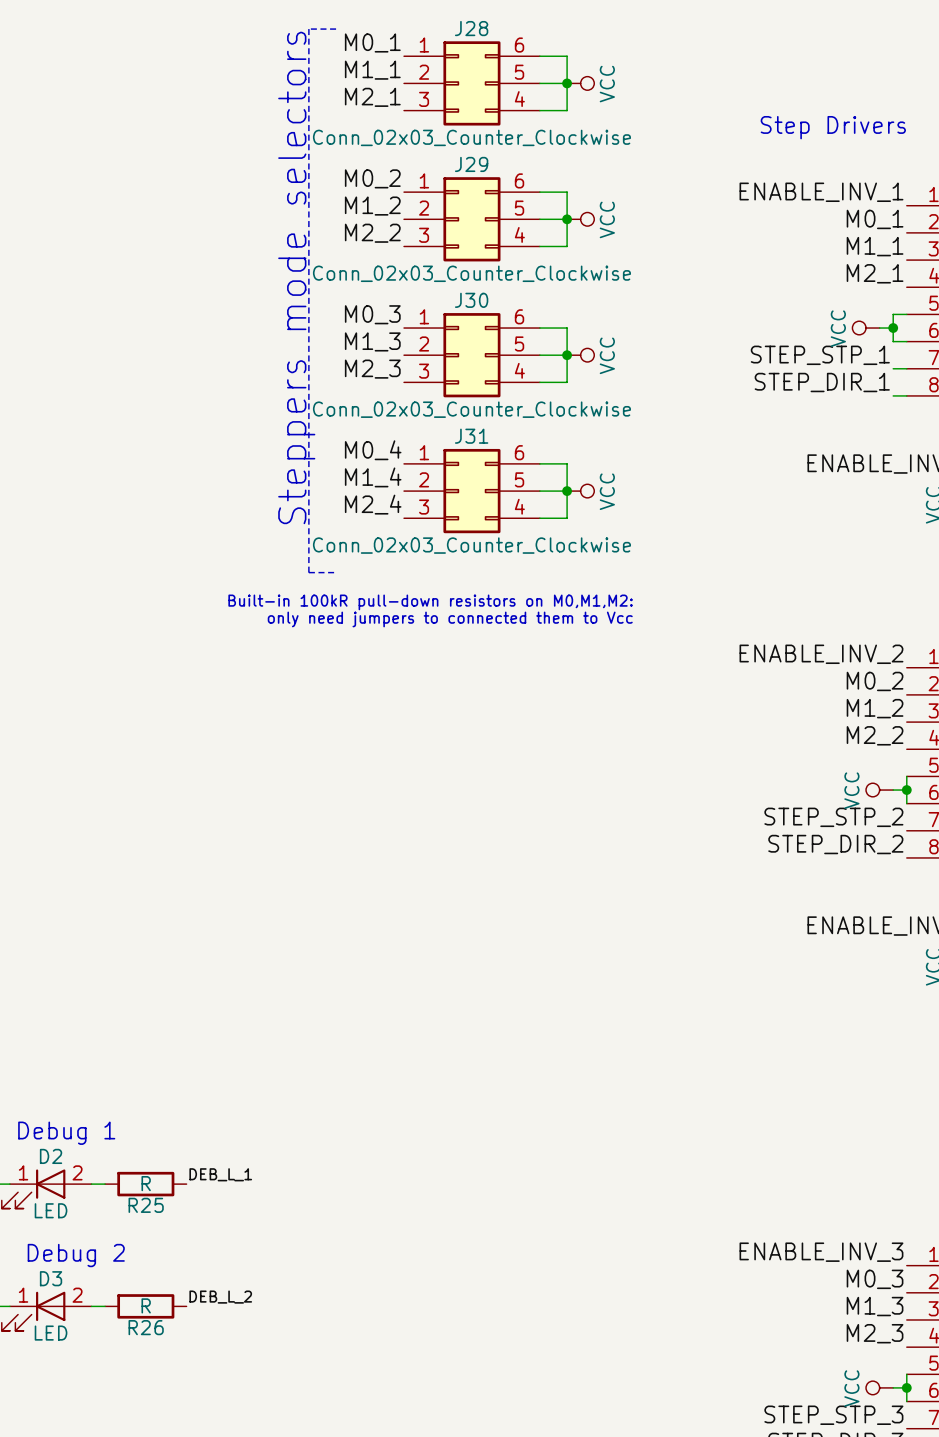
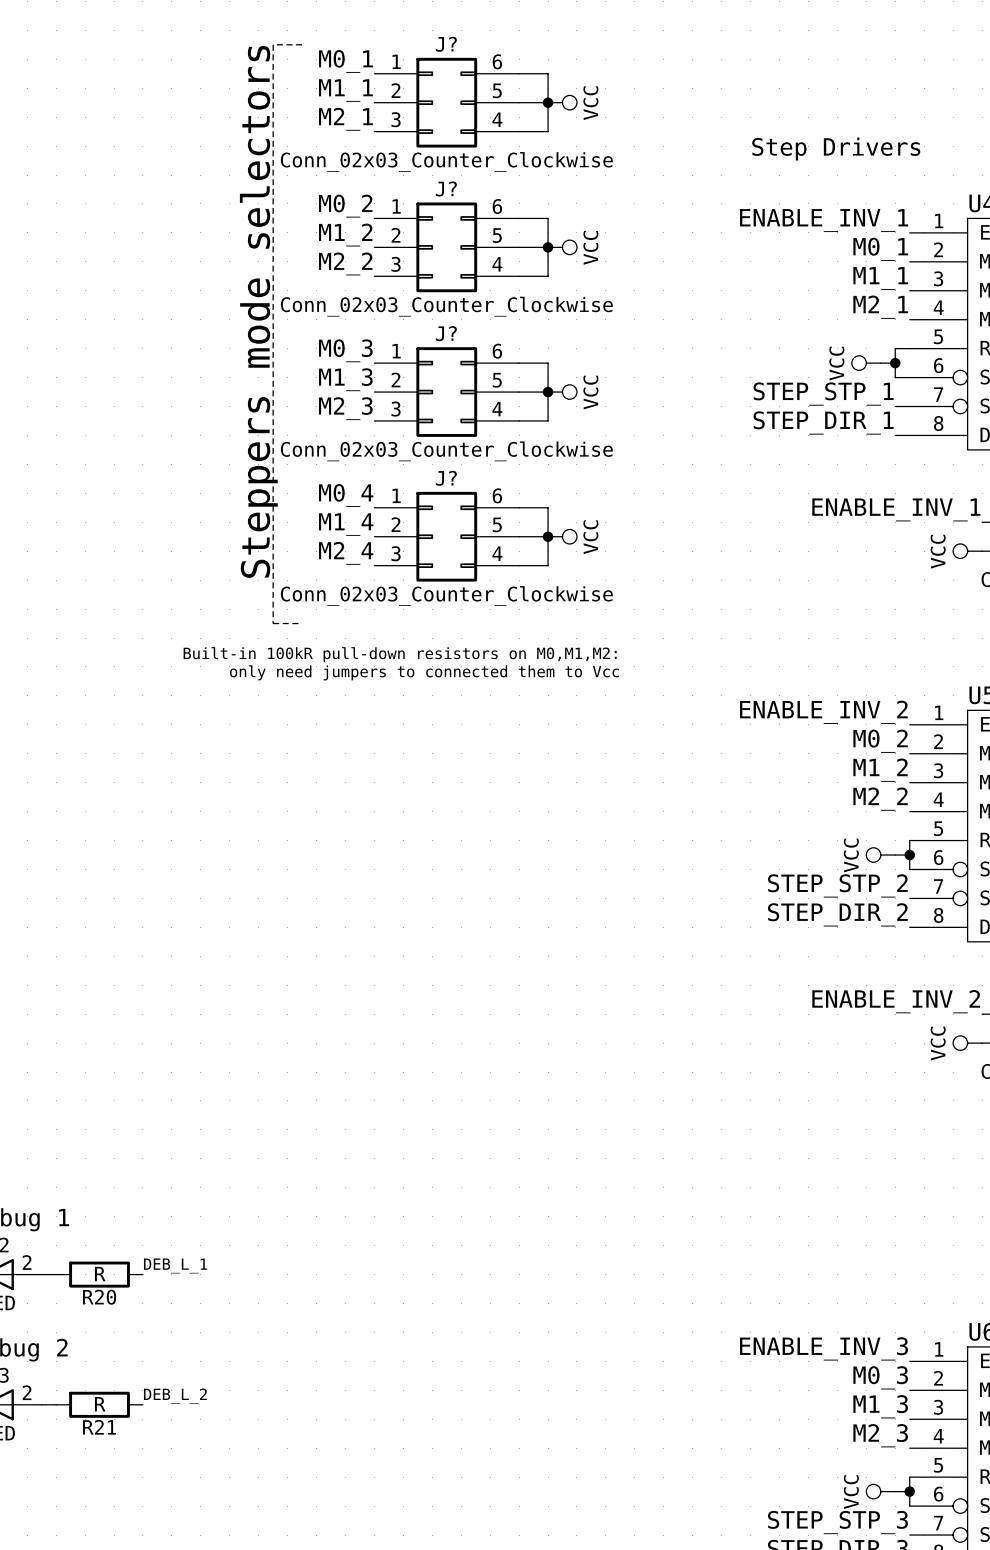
J28 name: J28 (471, 28) -> J? (446, 44)
J29 name: J29 (471, 164) -> J? (446, 188)
J30 name: J30 (471, 300) -> J? (446, 333)
J31 name: J31 (471, 436) -> J? (446, 478)
R25 name: R25 (146, 1205) -> R20 (99, 1297)
R26 name: R26 (146, 1327) -> R21 (99, 1427)

